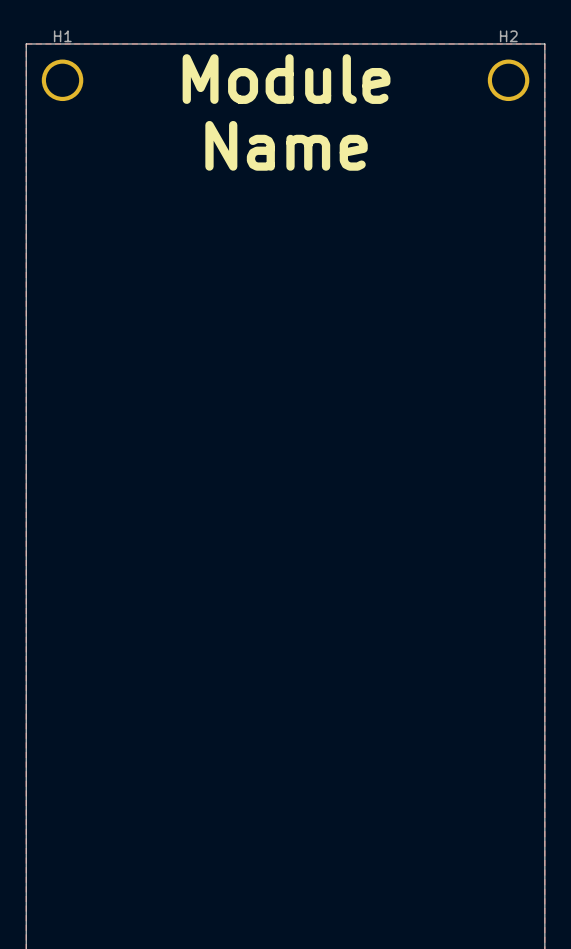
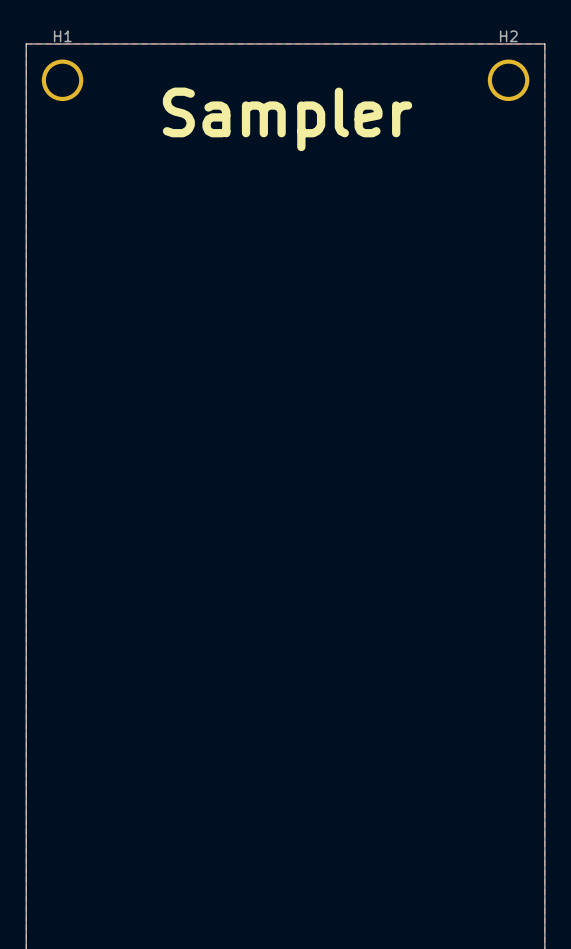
text: Module (286, 79) -> none
text: none -> Sampler (287, 119)
text: Name (286, 145) -> none

